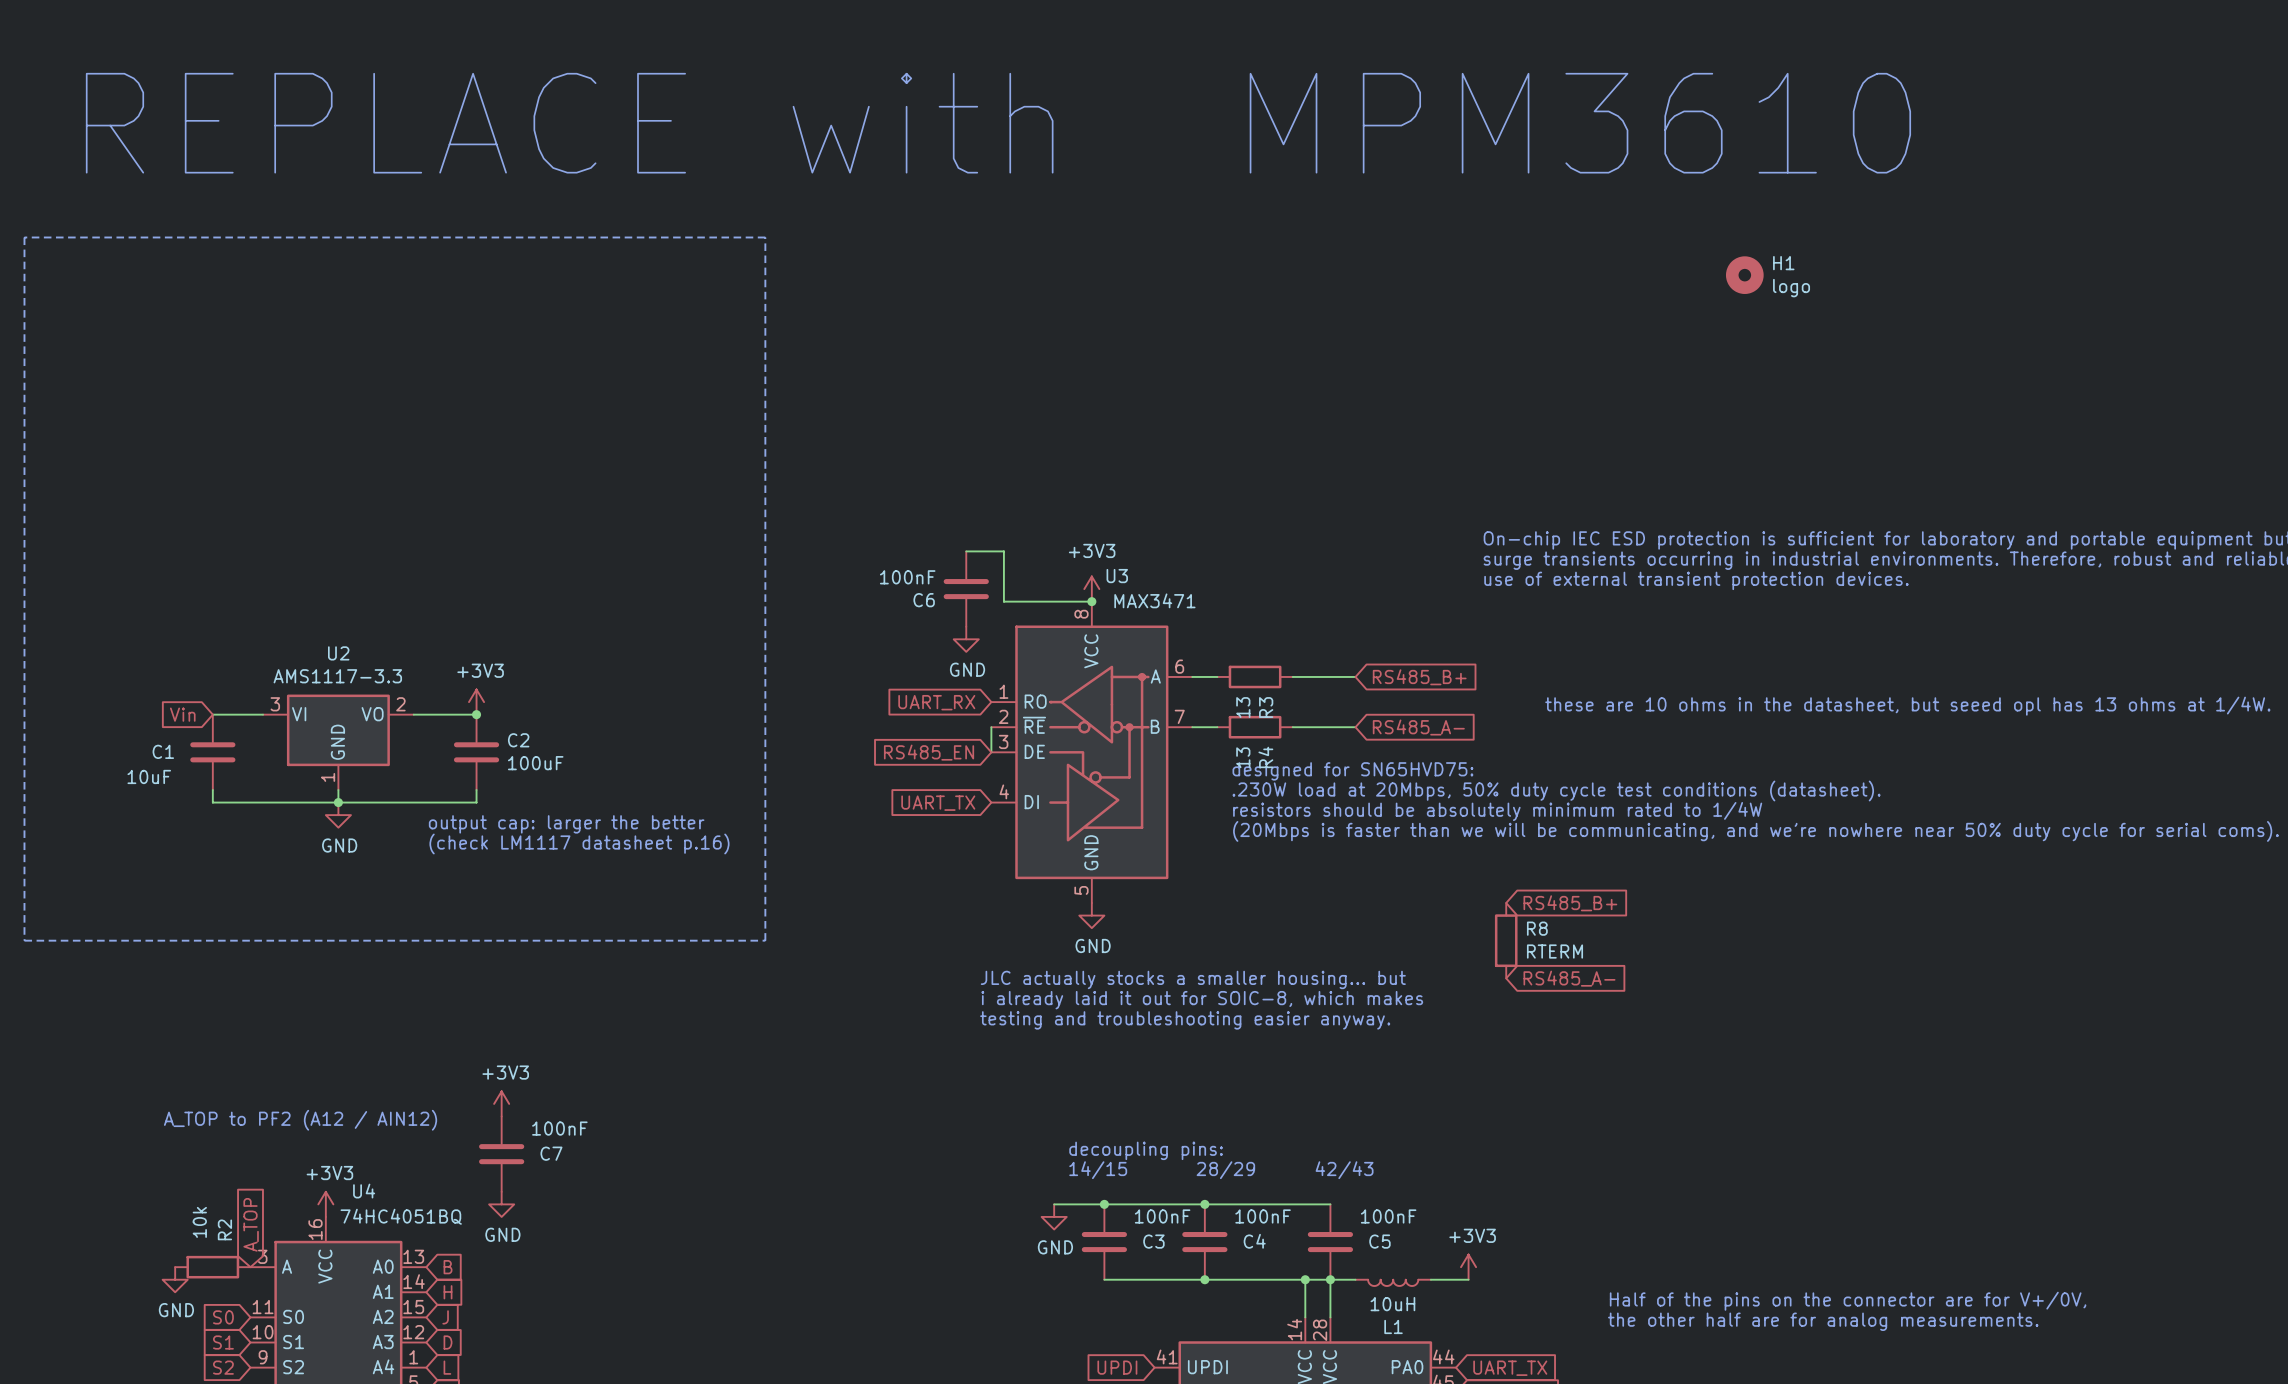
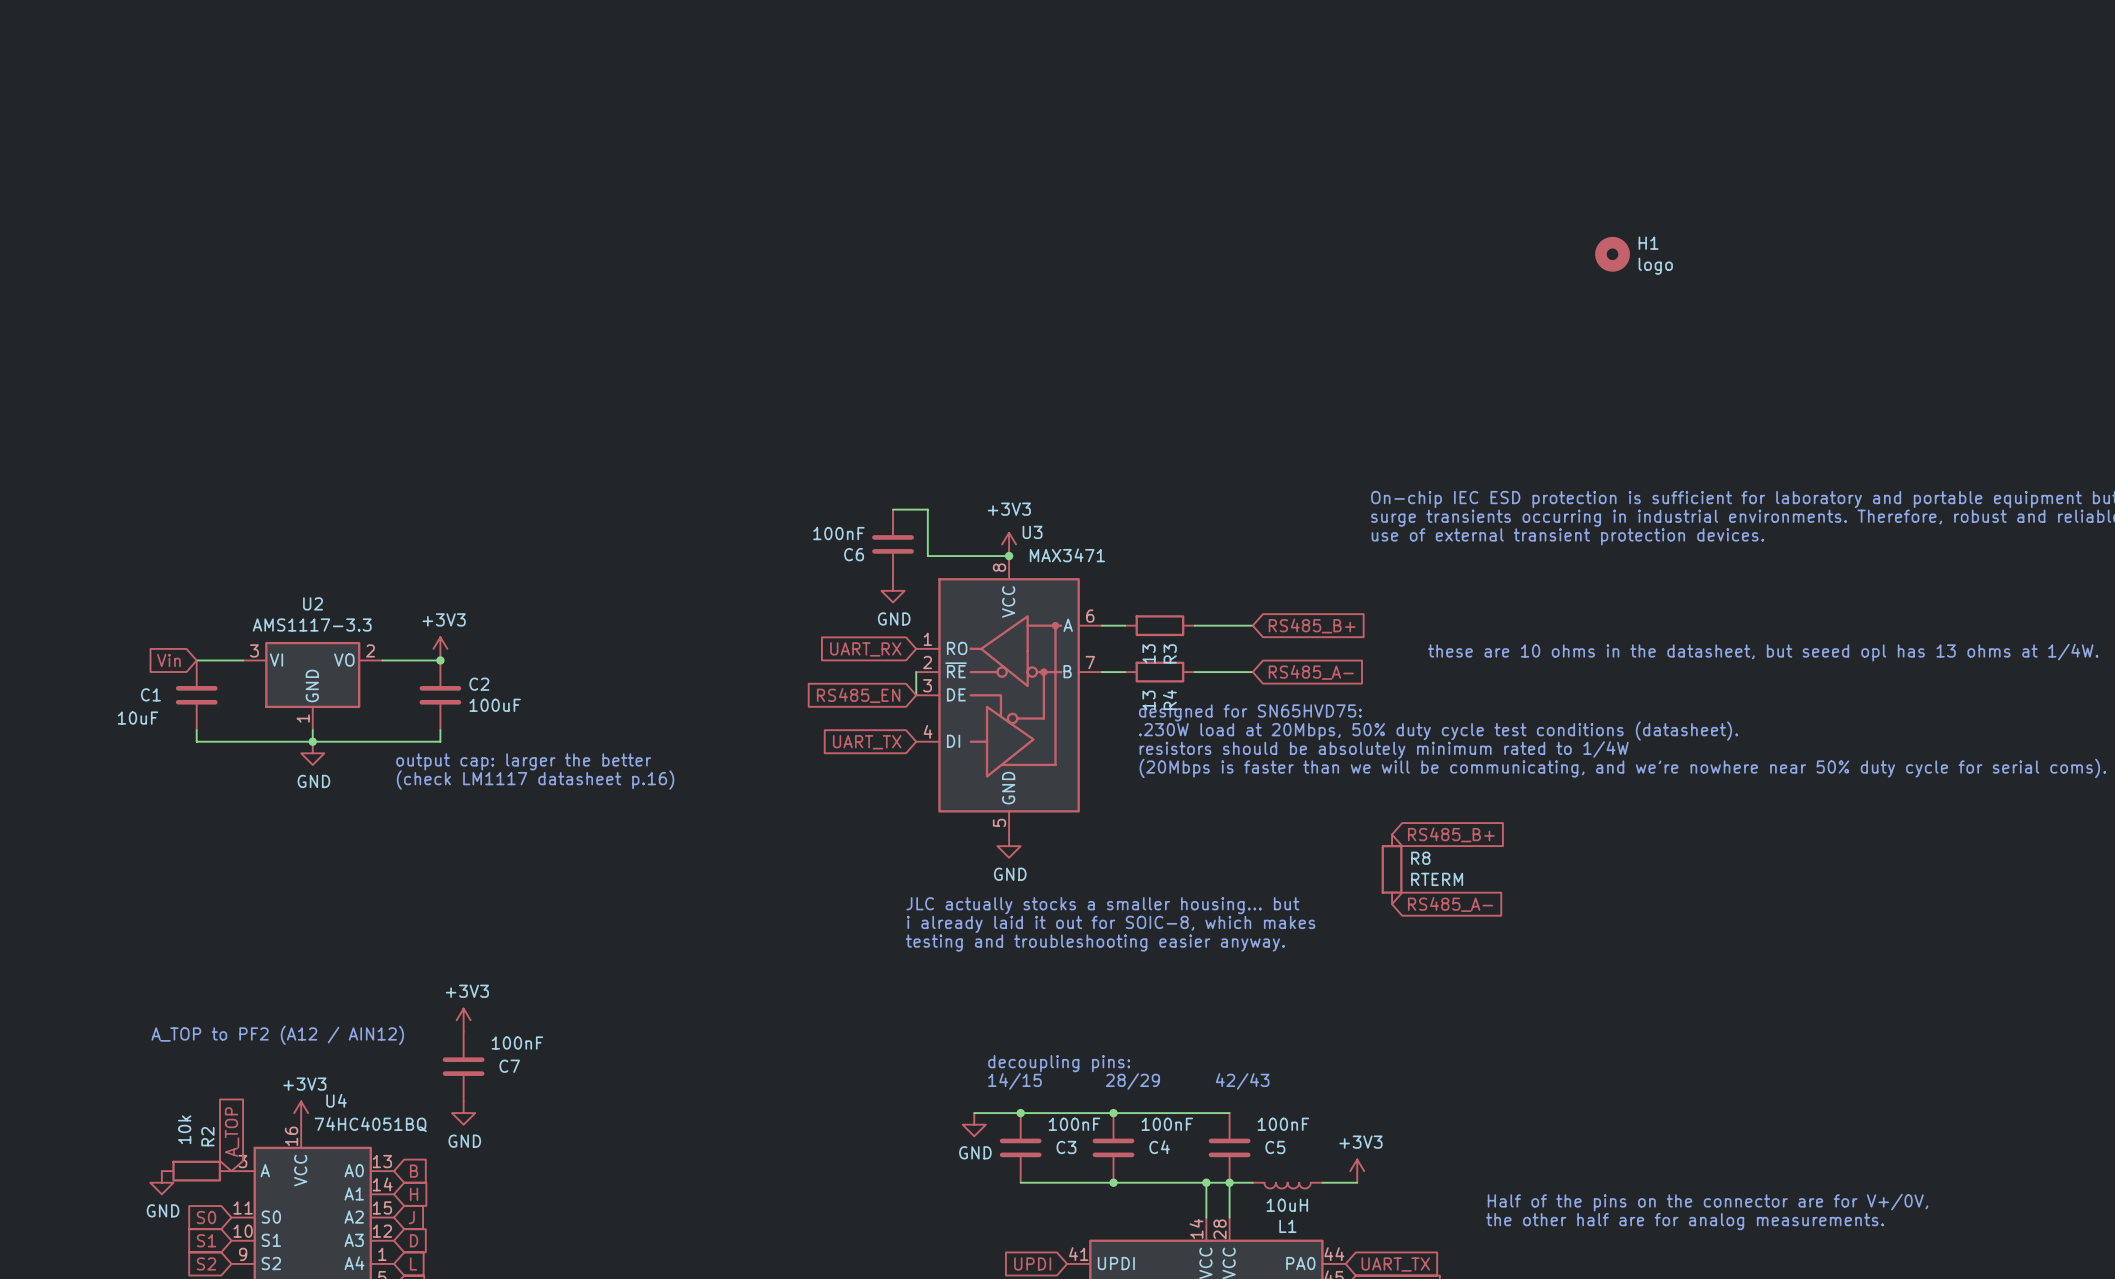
text: REPLACE with MPM3610 (998, 123) -> none
line: (24, 237) (765, 237) (765, 940) (24, 940) (24, 237) -> none

